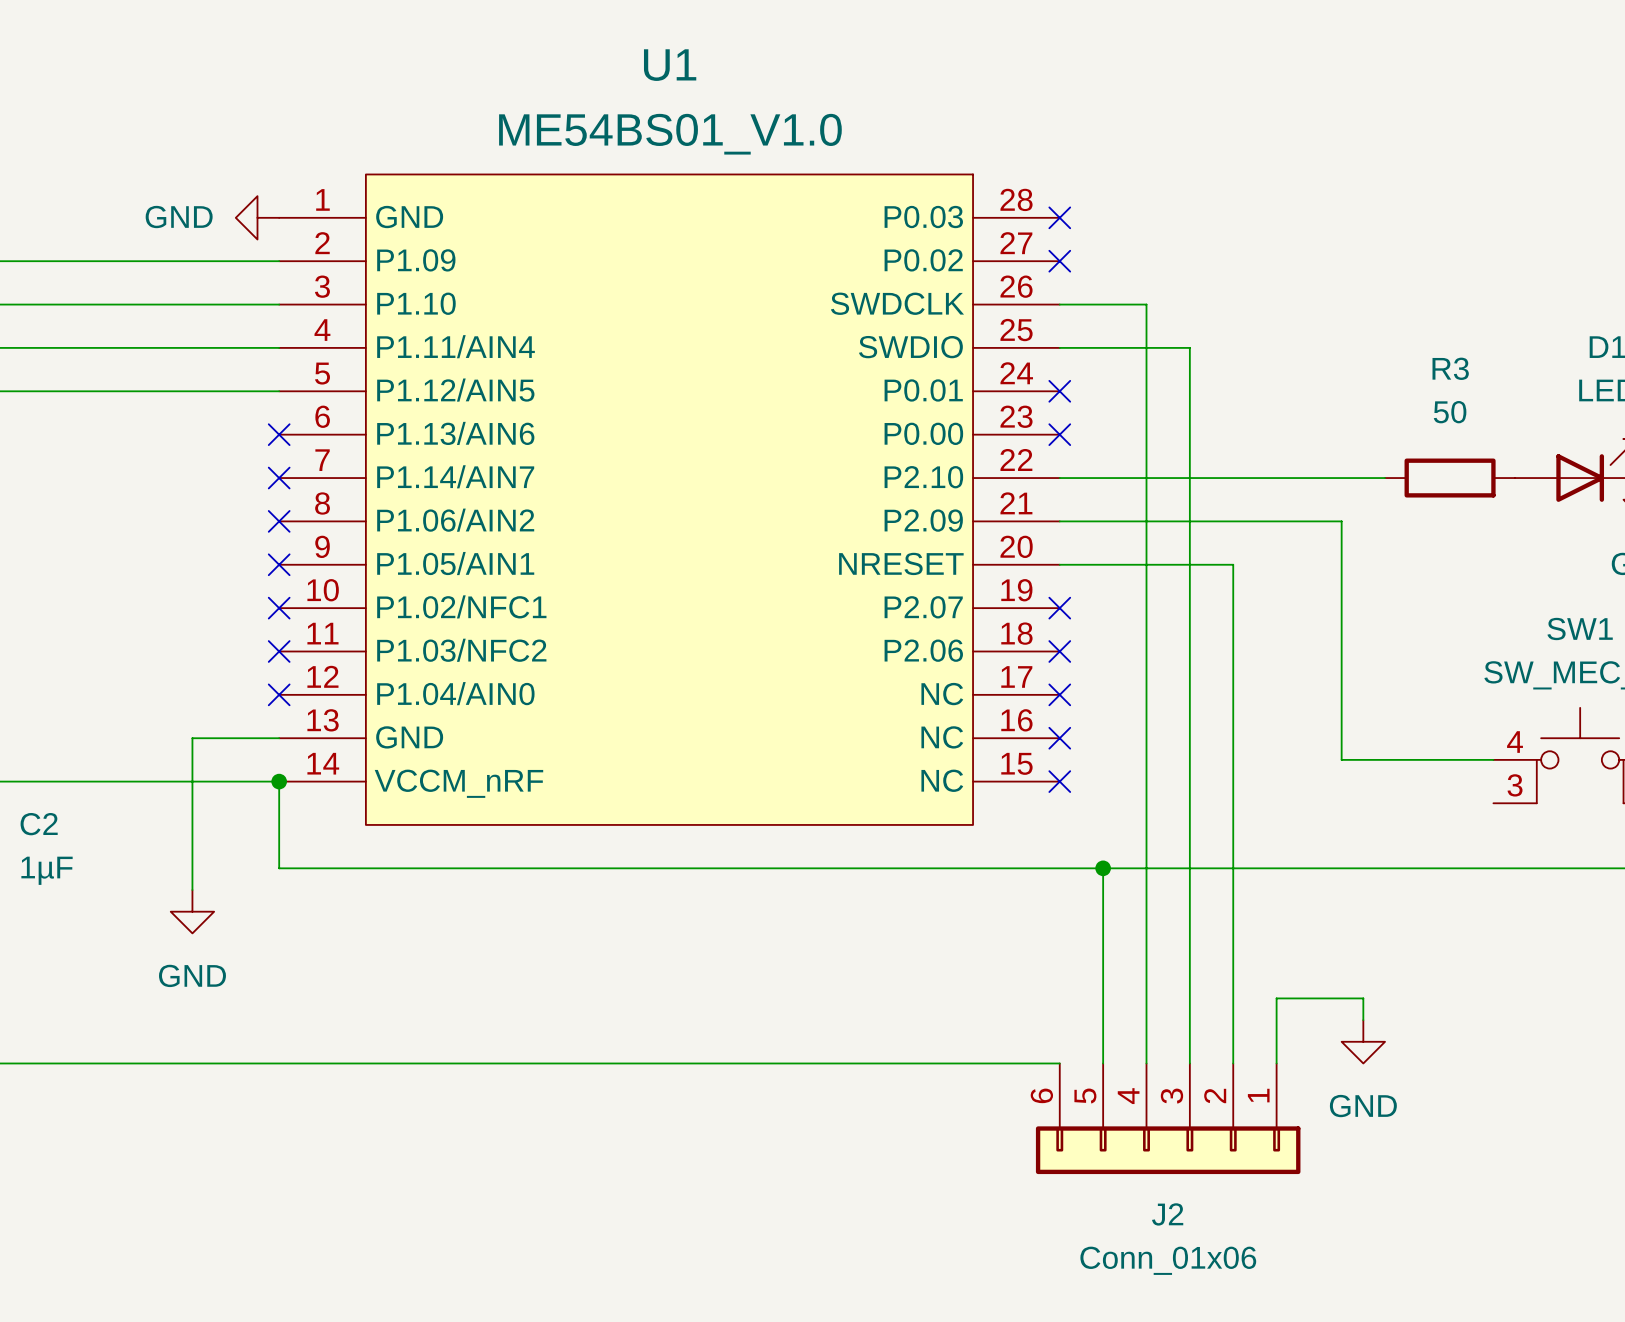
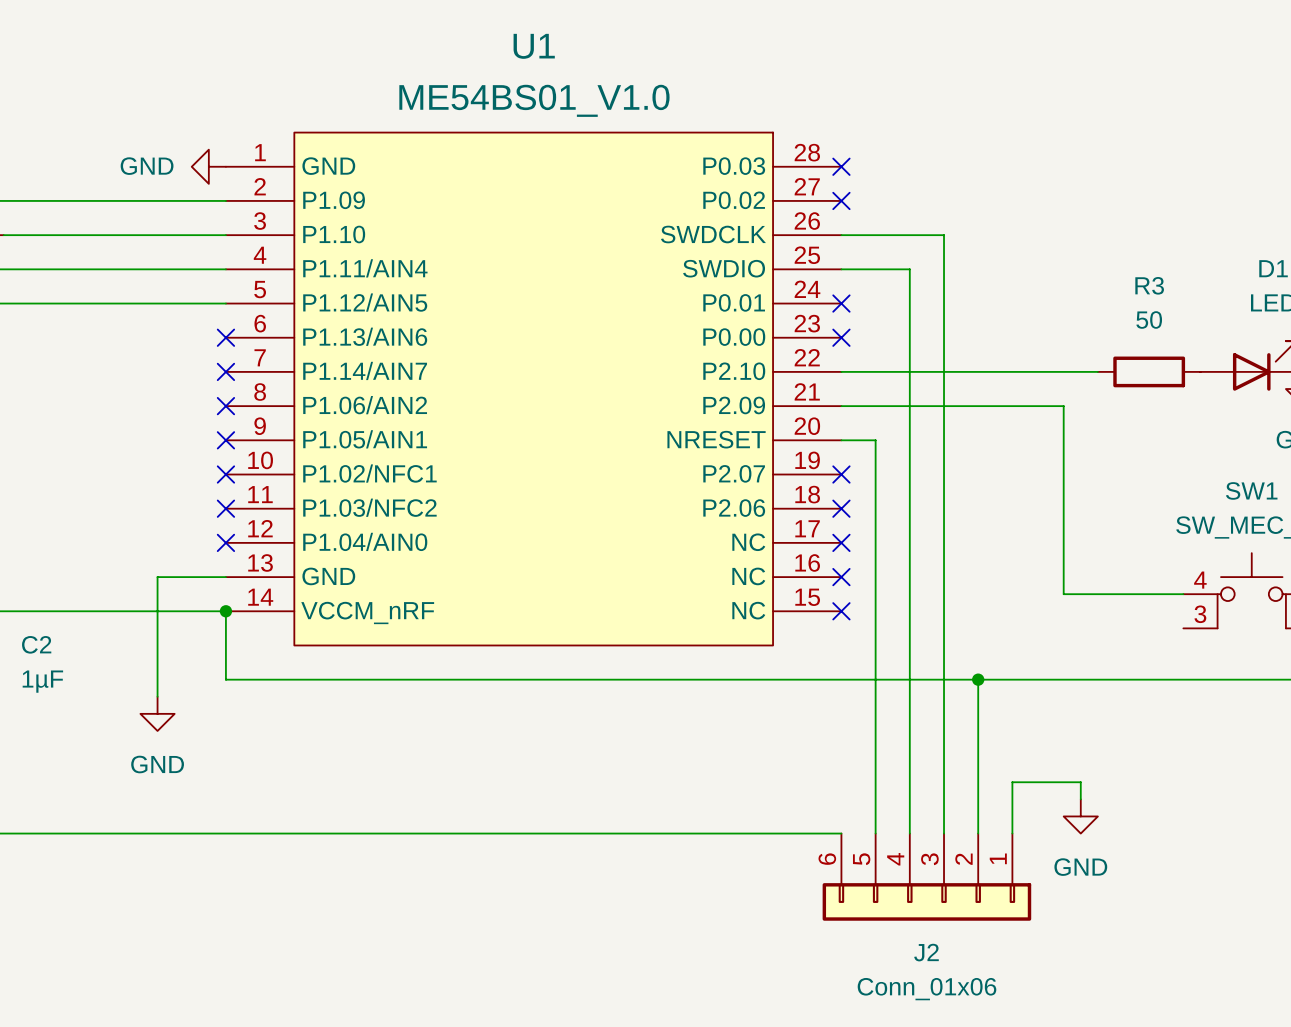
wire: (1146, 304) (1146, 347) (1189, 347) -> (909, 235) (944, 235) (944, 269)
wire: (1103, 564) (1233, 564) (1233, 868) -> (875, 440) (875, 679)
junction: (1103, 868) -> none
junction: none -> (978, 679)

